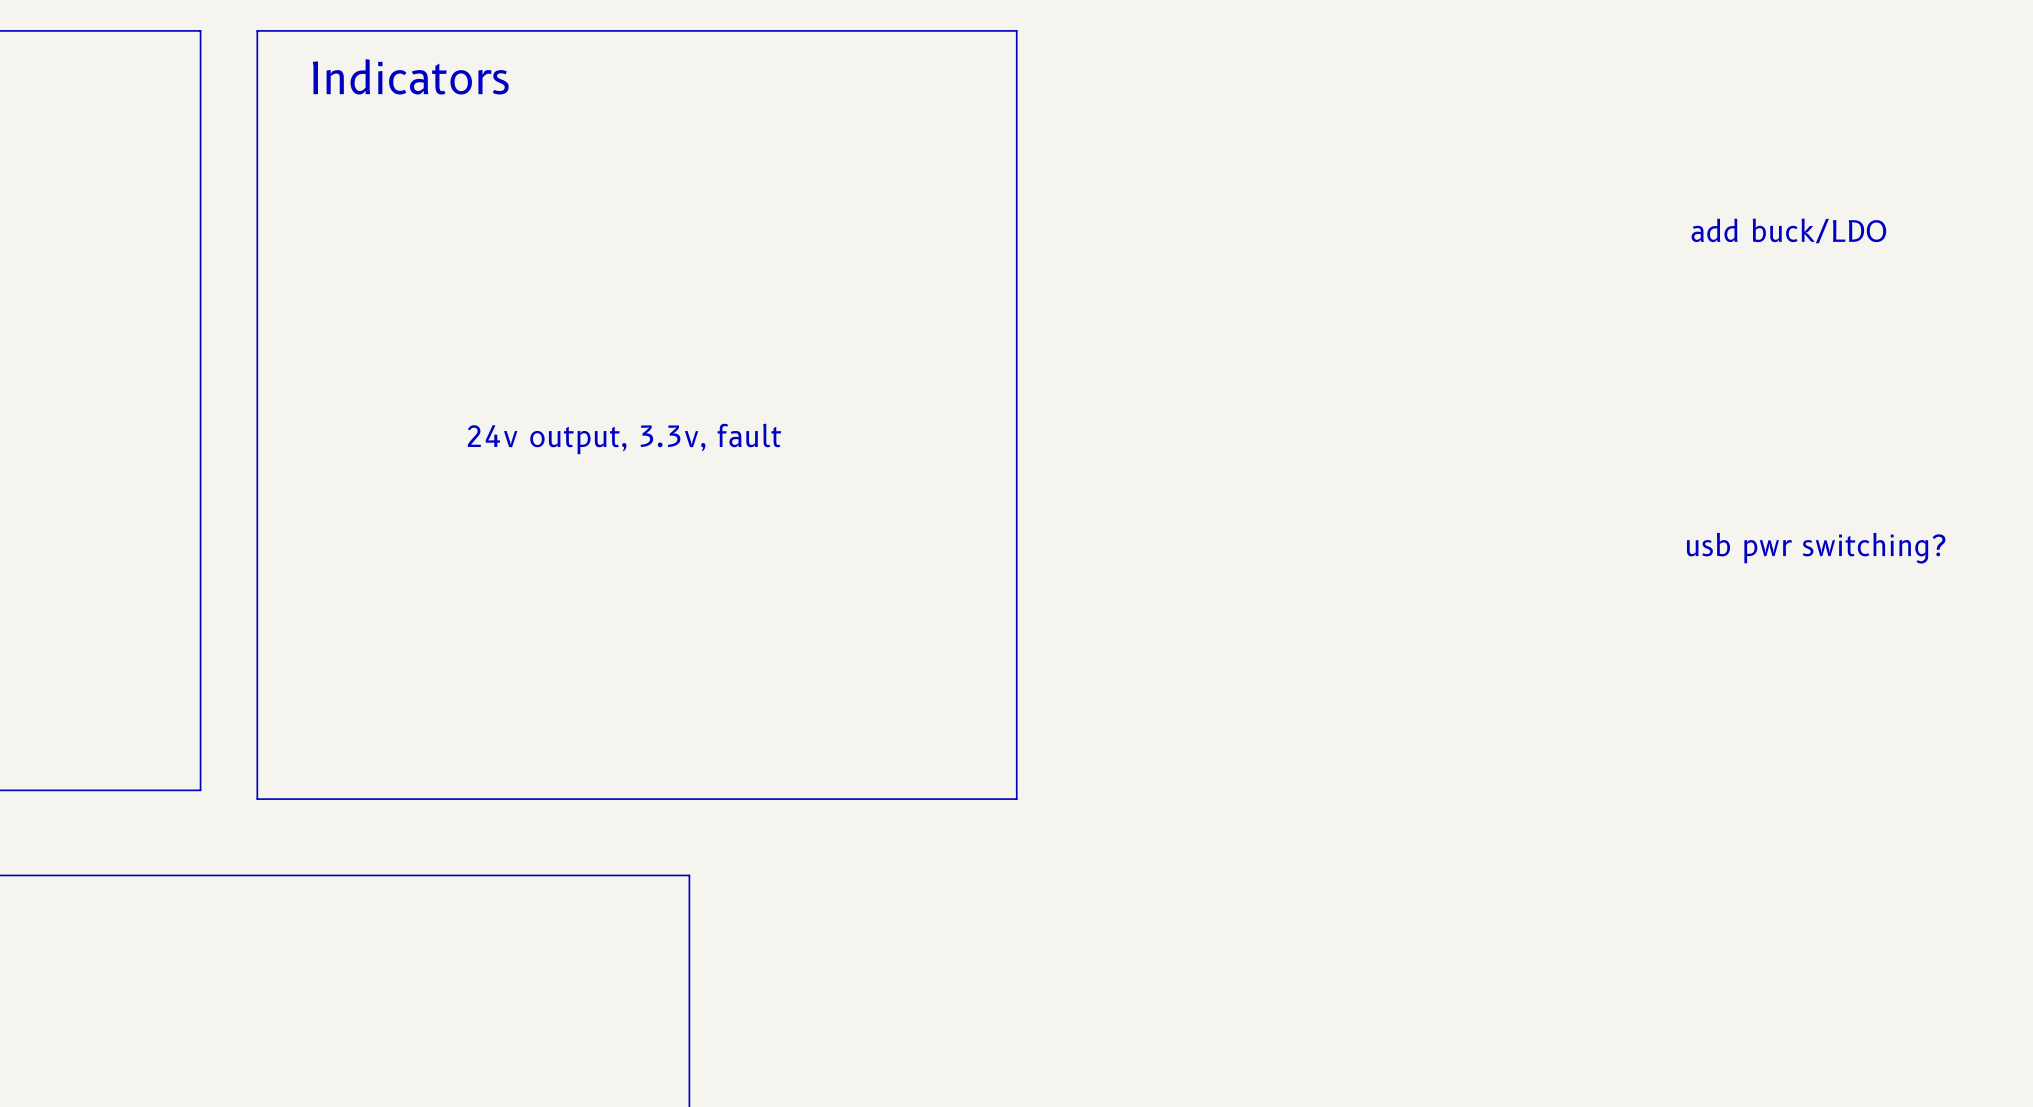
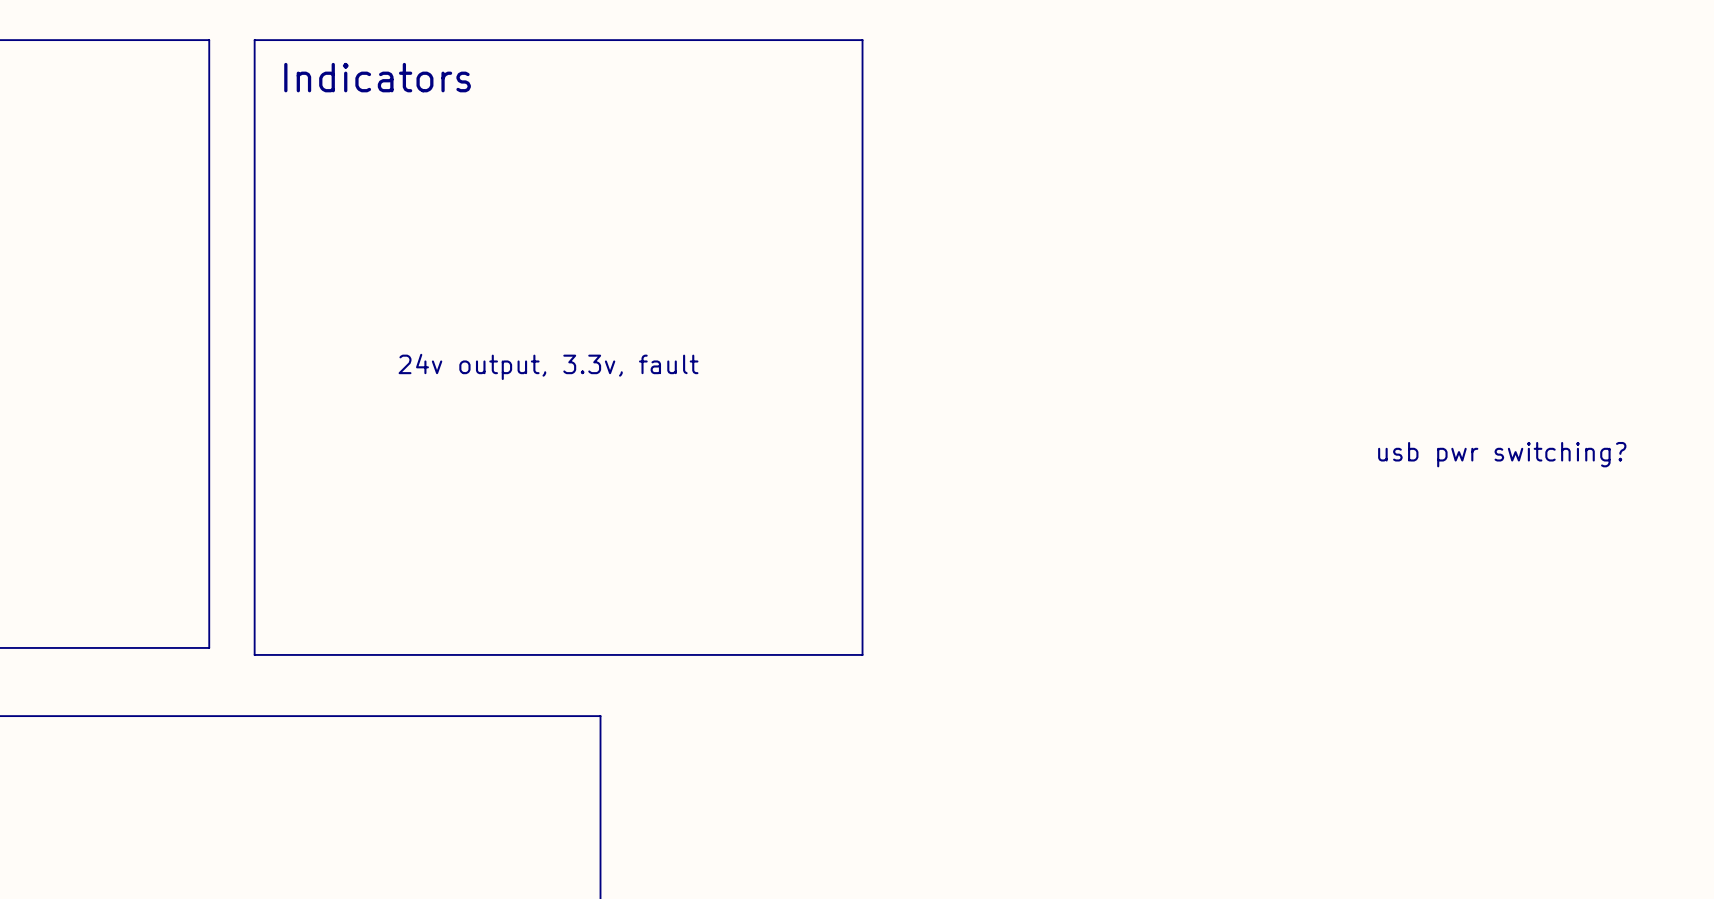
text: add buck/LDO (1788, 230) -> none

